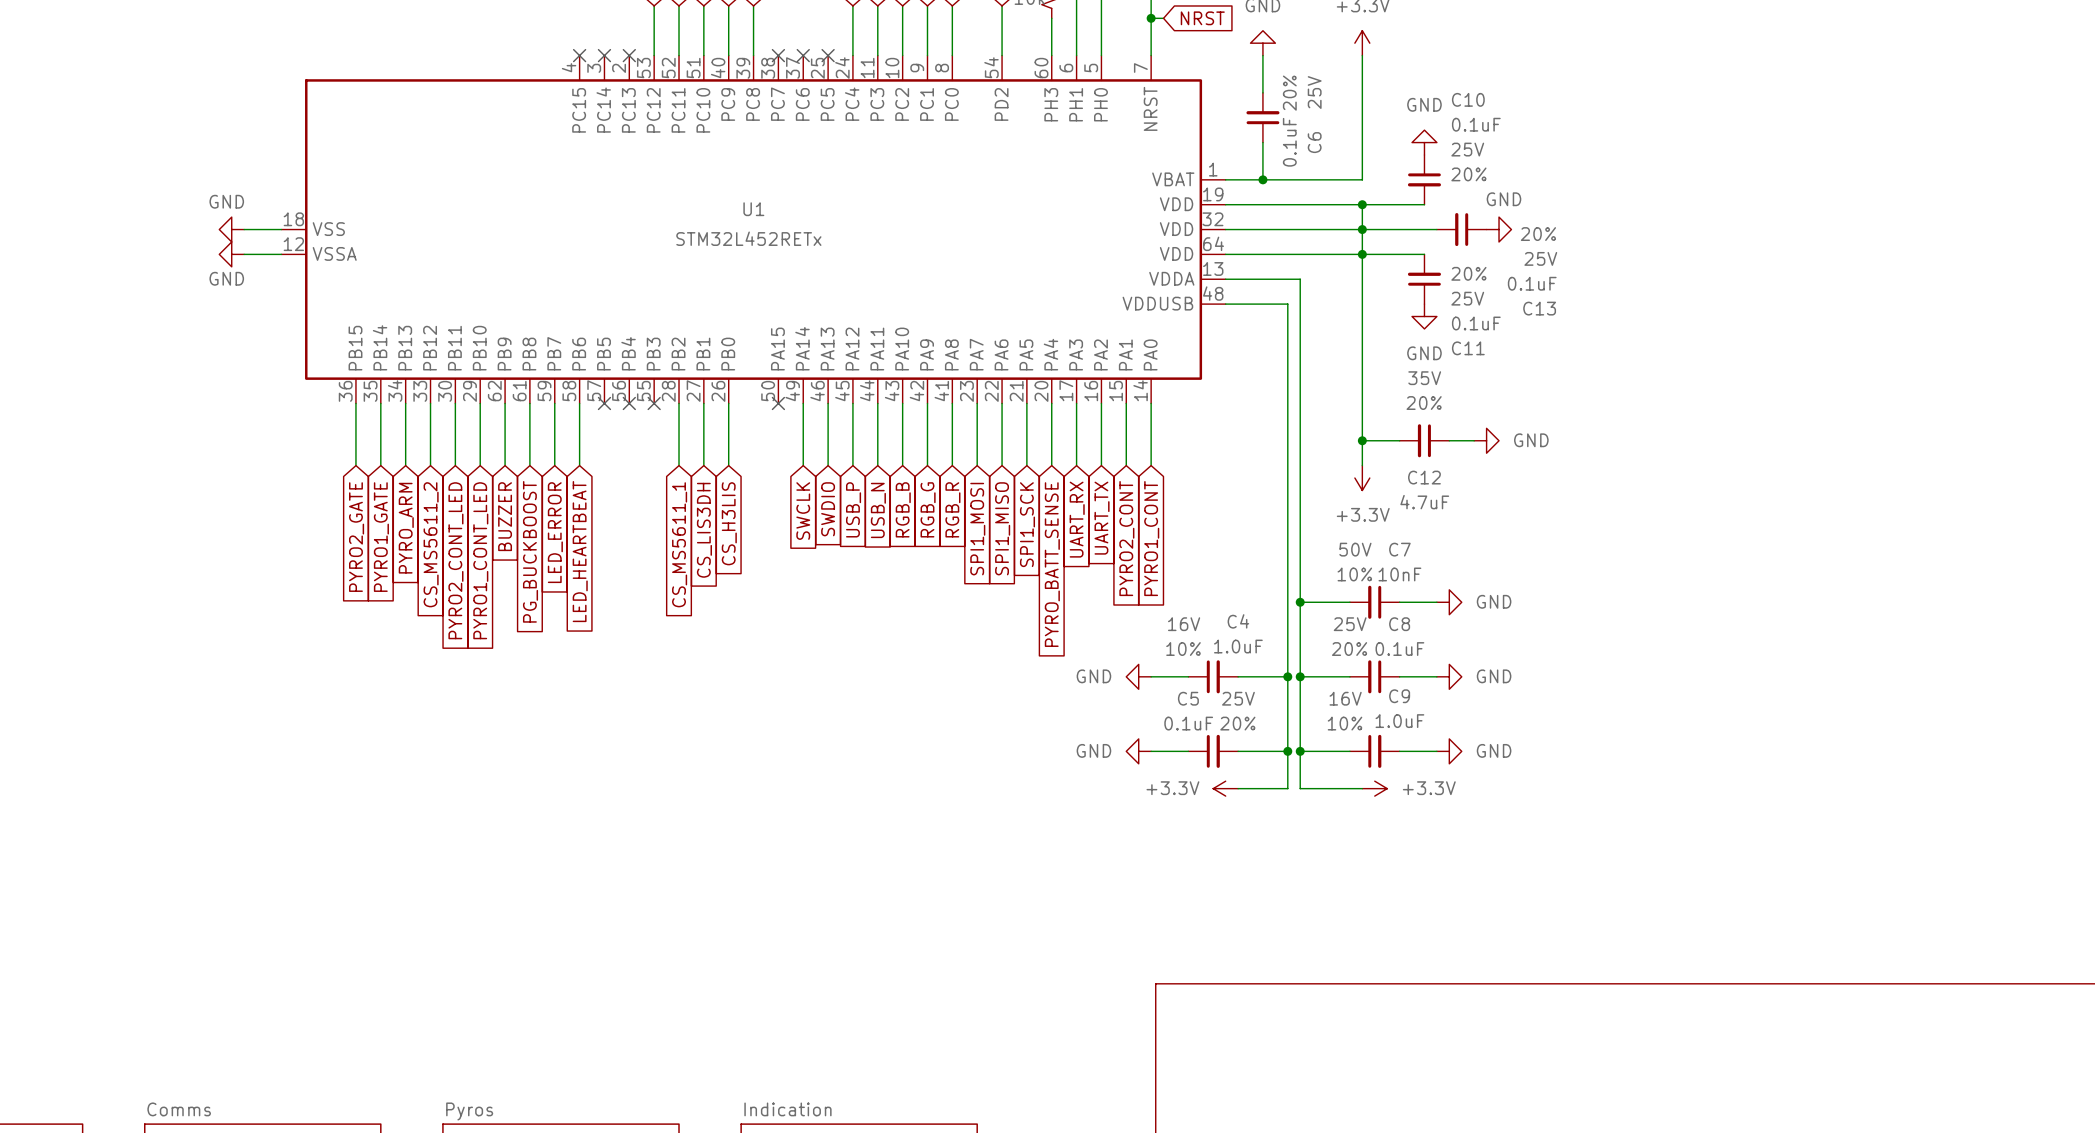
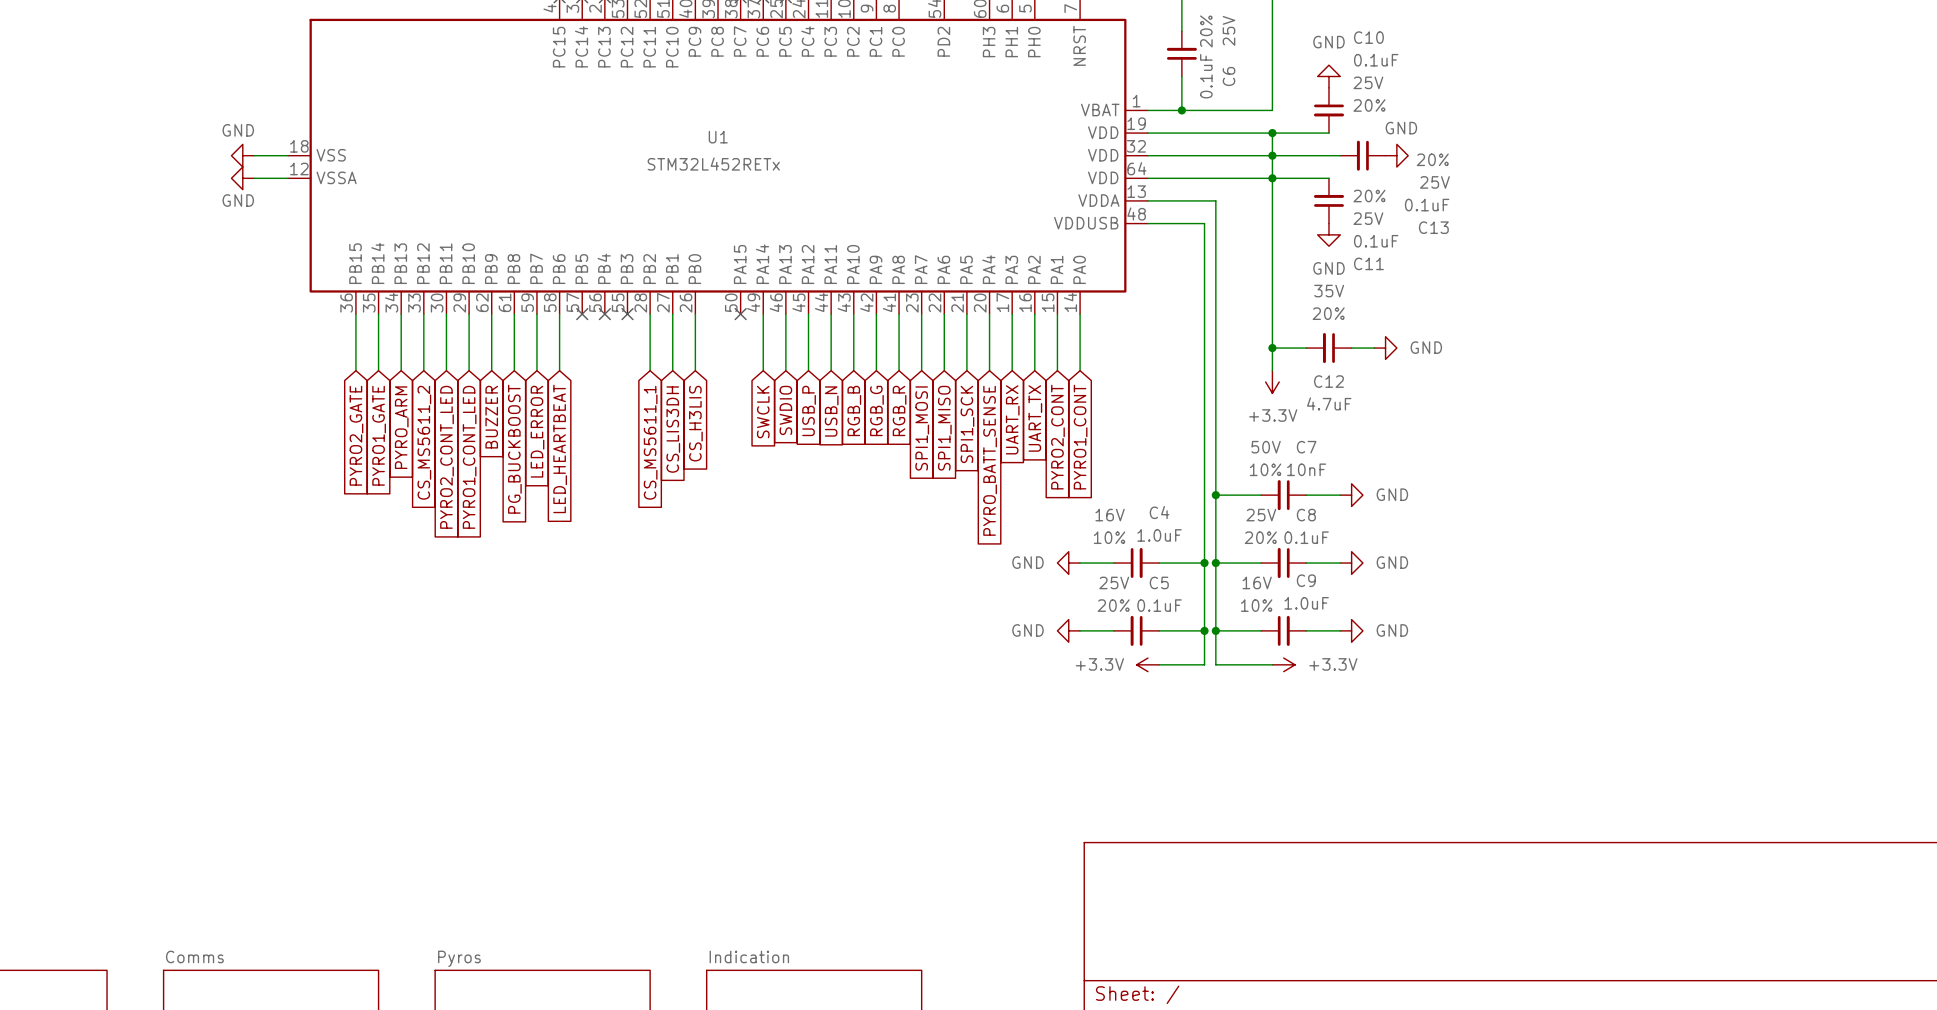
C5 name position: C5 (1188, 698) -> C5 (1159, 582)
C5 text position: 25V (1238, 698) -> 25V (1114, 582)
C5 value position: 0.1uF (1188, 723) -> 0.1uF (1159, 605)
C5 text position: 20% (1237, 723) -> 20% (1113, 605)
C5 rotation: 0° (1213, 751) -> 180° (1136, 630)

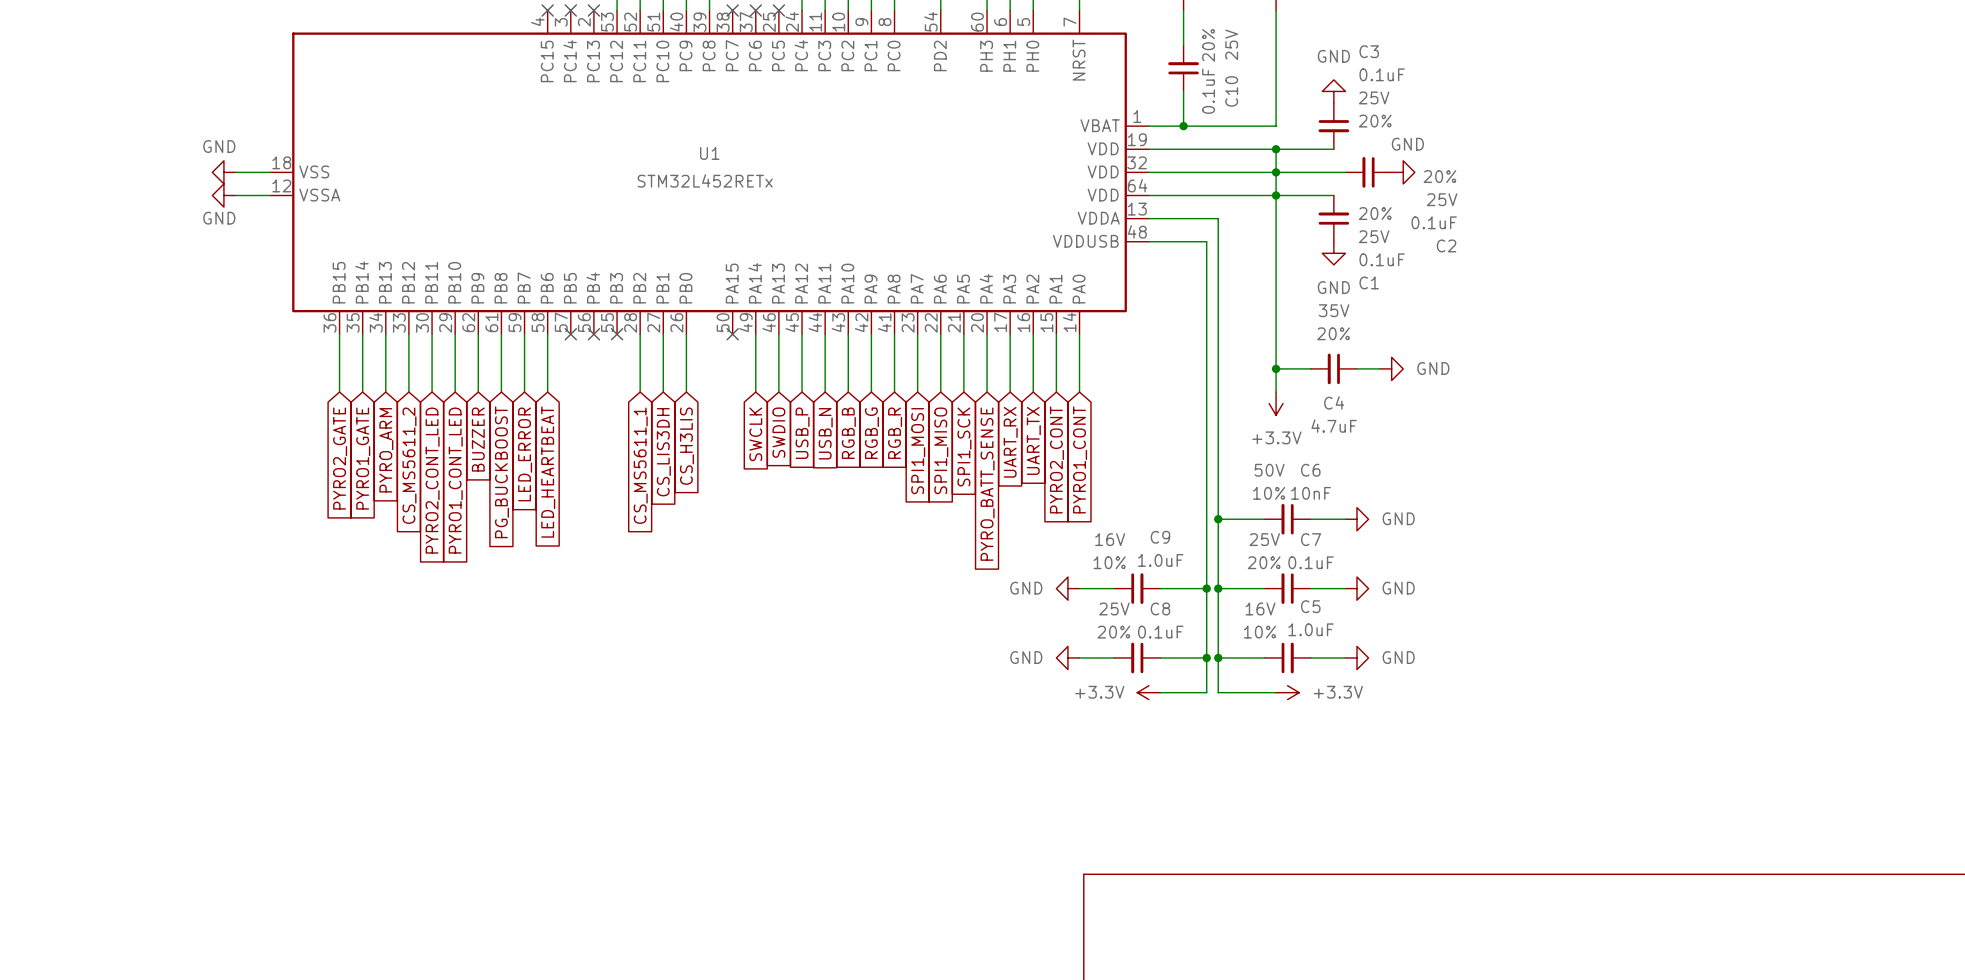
C10 name: C10 (1368, 37) -> C3 (1369, 51)
C6 name: C6 (1228, 76) -> C10 (1231, 91)
C13 name: C13 (1433, 227) -> C2 (1446, 245)
C11 name: C11 (1368, 263) -> C1 (1369, 282)
C12 name: C12 (1328, 381) -> C4 (1334, 402)
C7 name: C7 (1306, 447) -> C6 (1310, 470)
C4 name: C4 (1159, 512) -> C9 (1160, 537)
C8 name: C8 (1306, 515) -> C7 (1311, 539)
C9 name: C9 (1306, 580) -> C5 (1310, 606)
C5 name: C5 (1159, 582) -> C8 (1160, 608)

